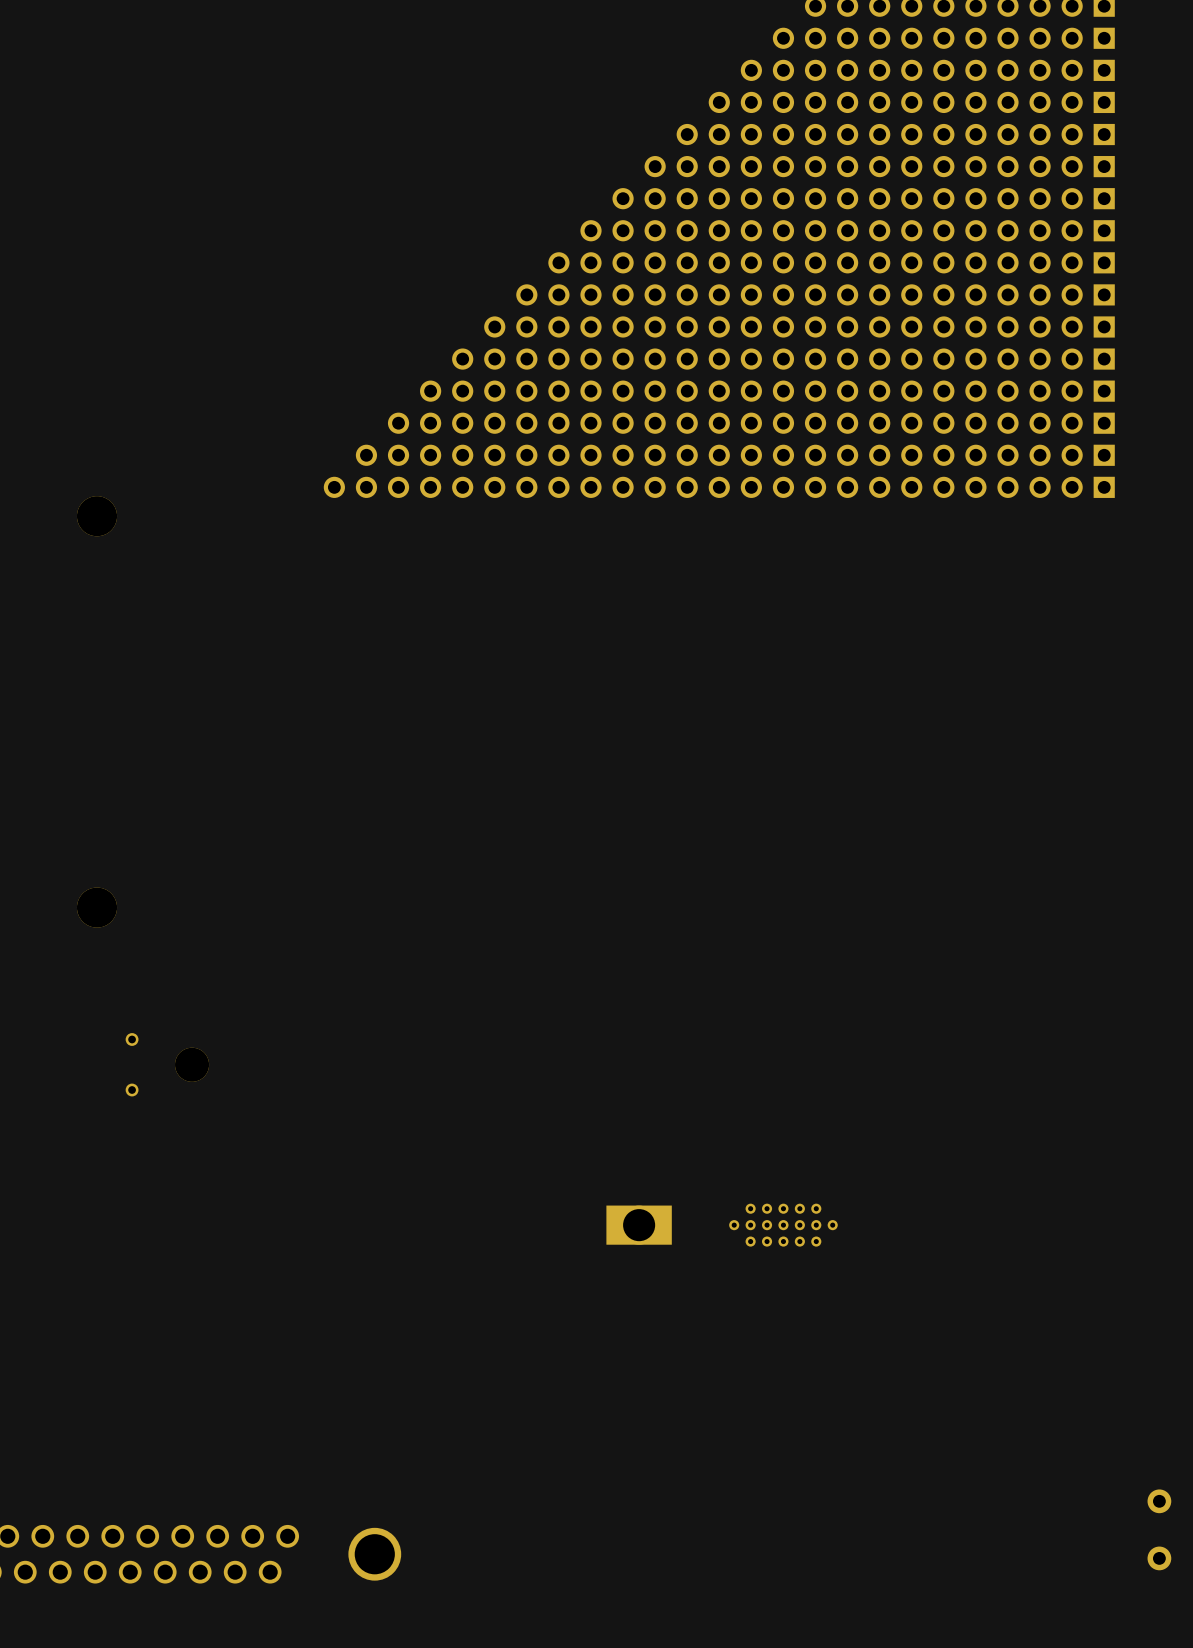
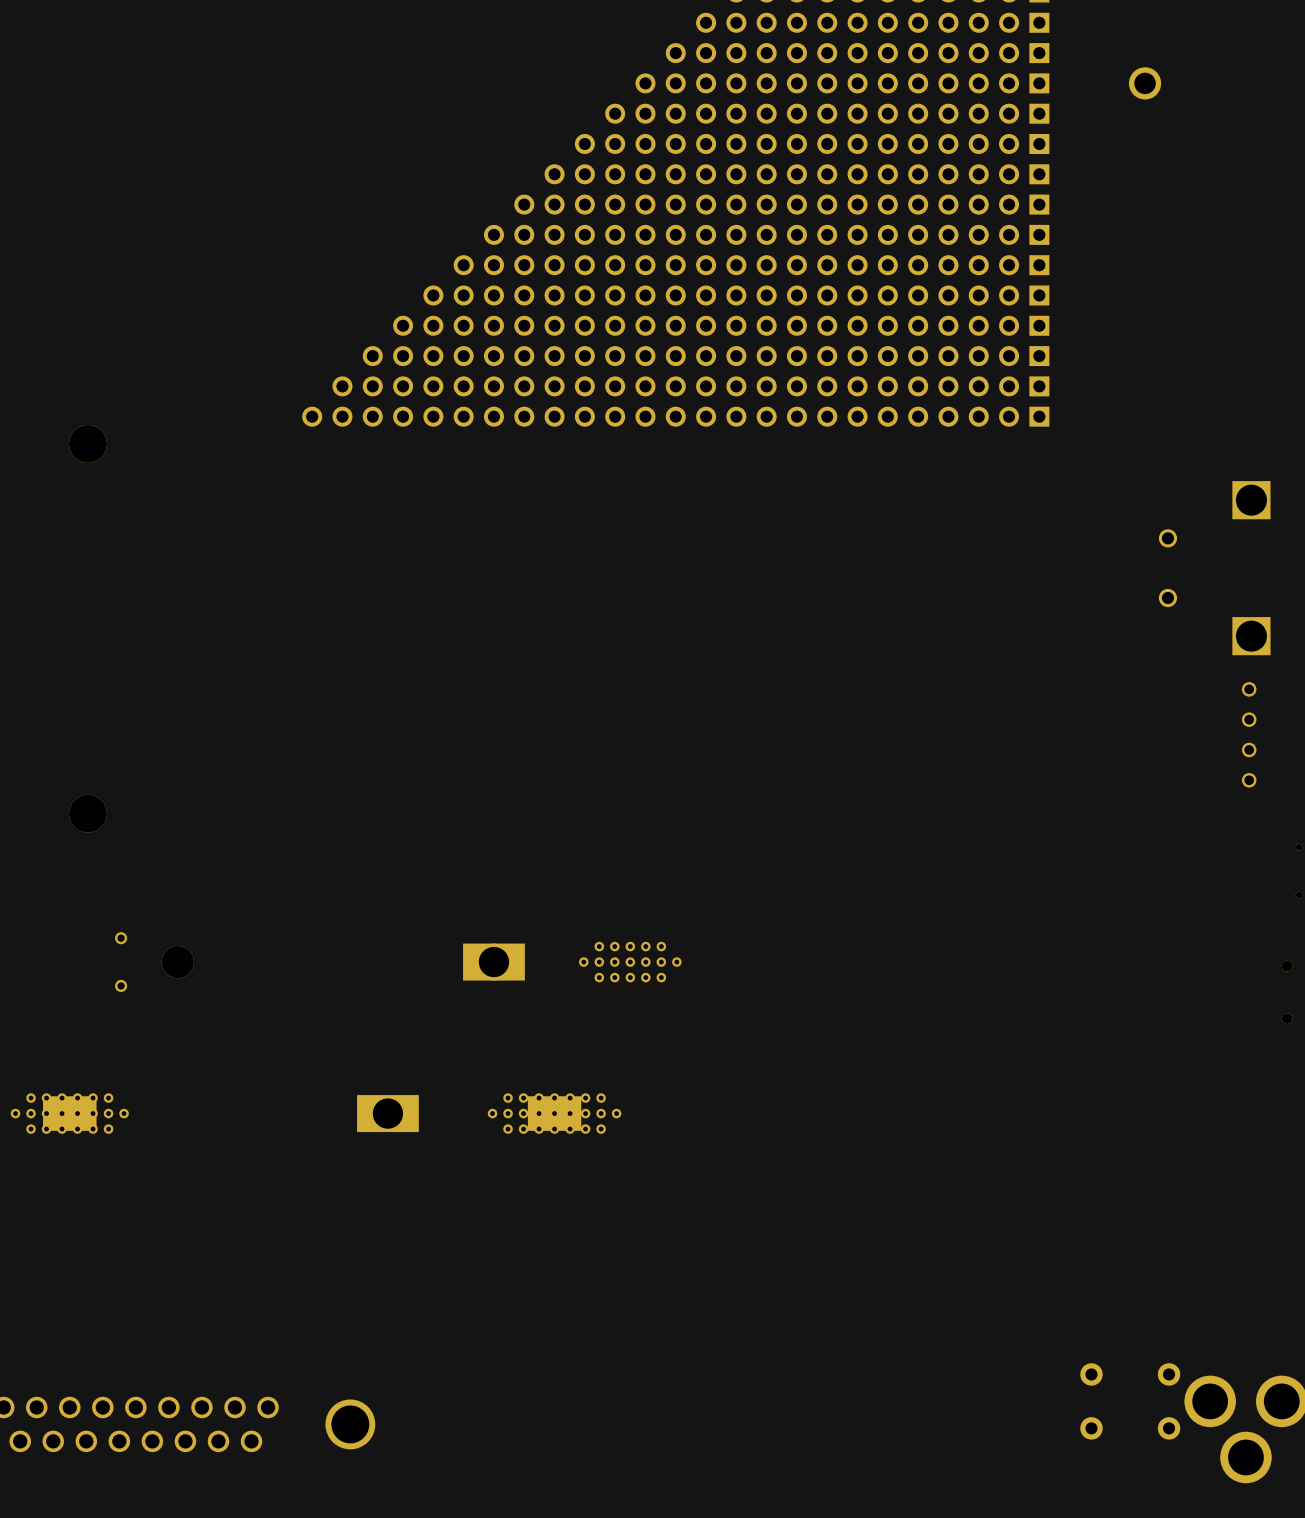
part: none -> (69, 1113)
part: none -> (387, 1113)
part: none -> (554, 1113)
part position: (639, 1225) -> (493, 962)
part position: (783, 1225) -> (630, 962)

